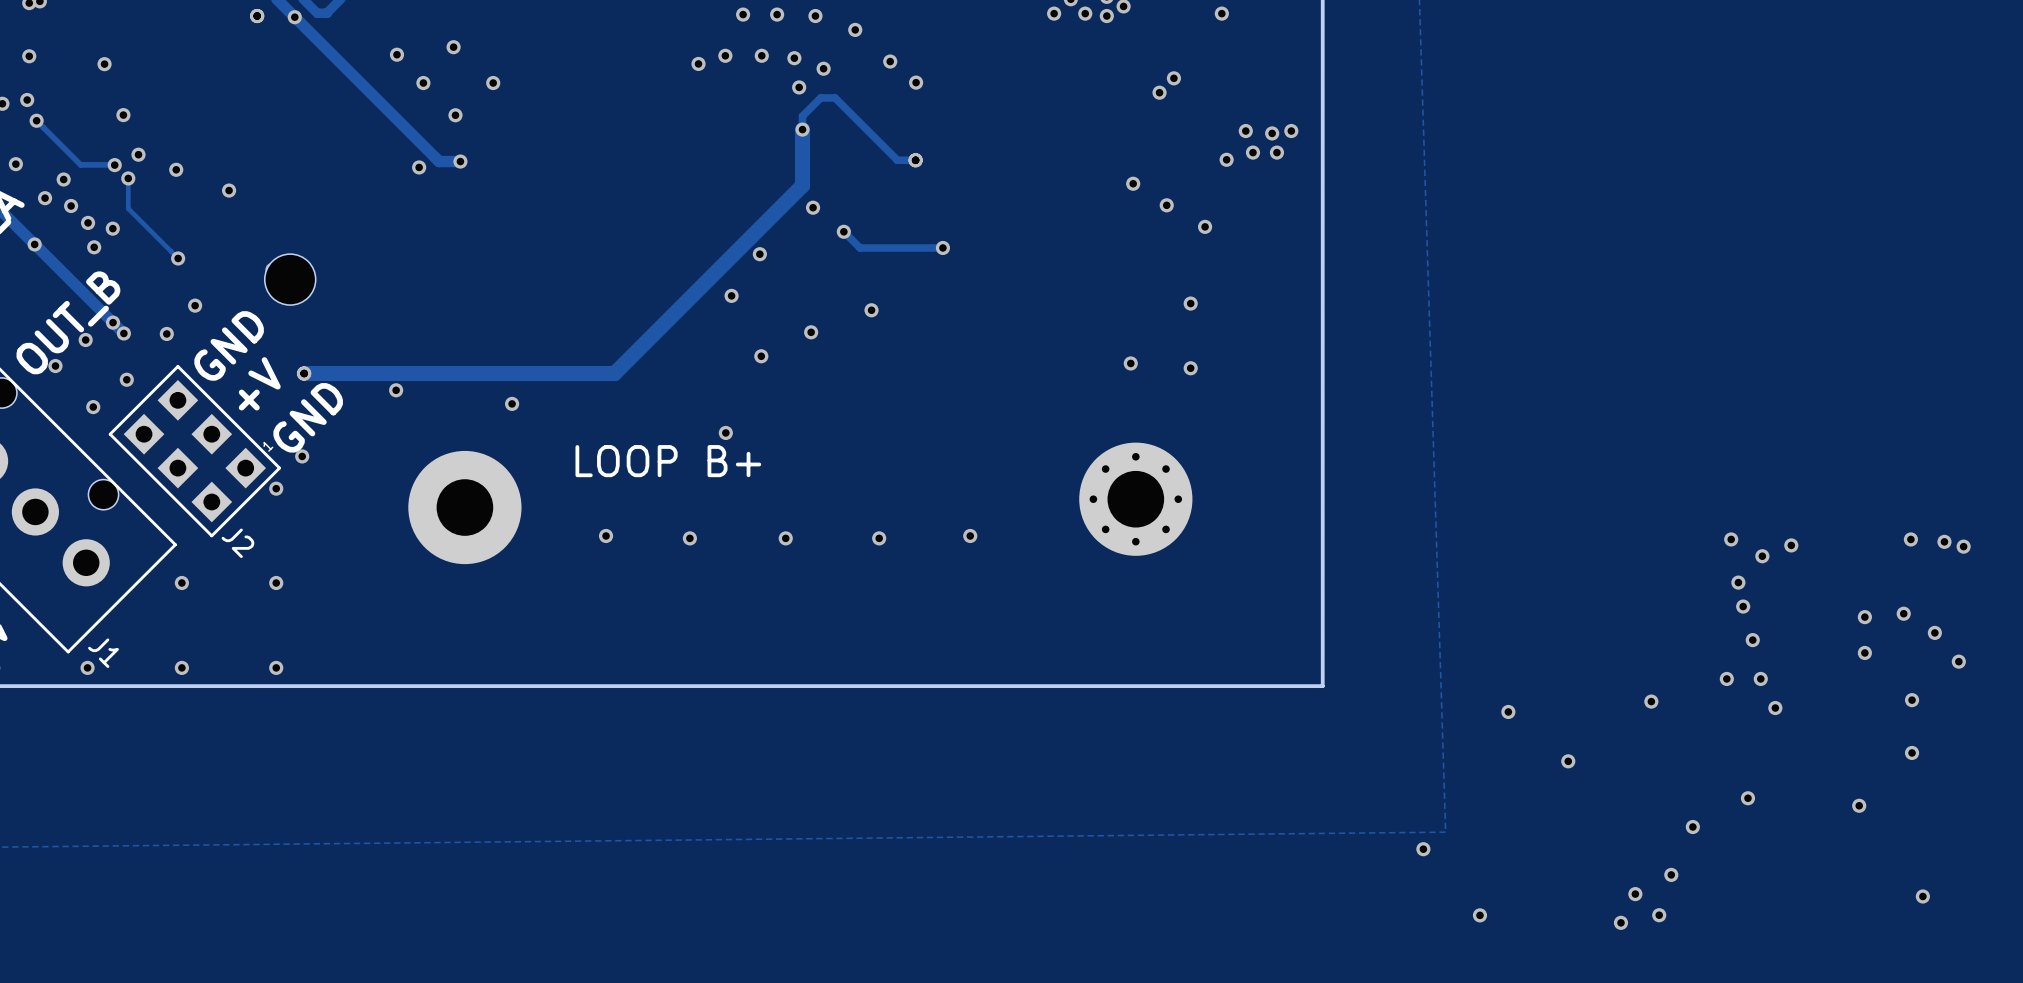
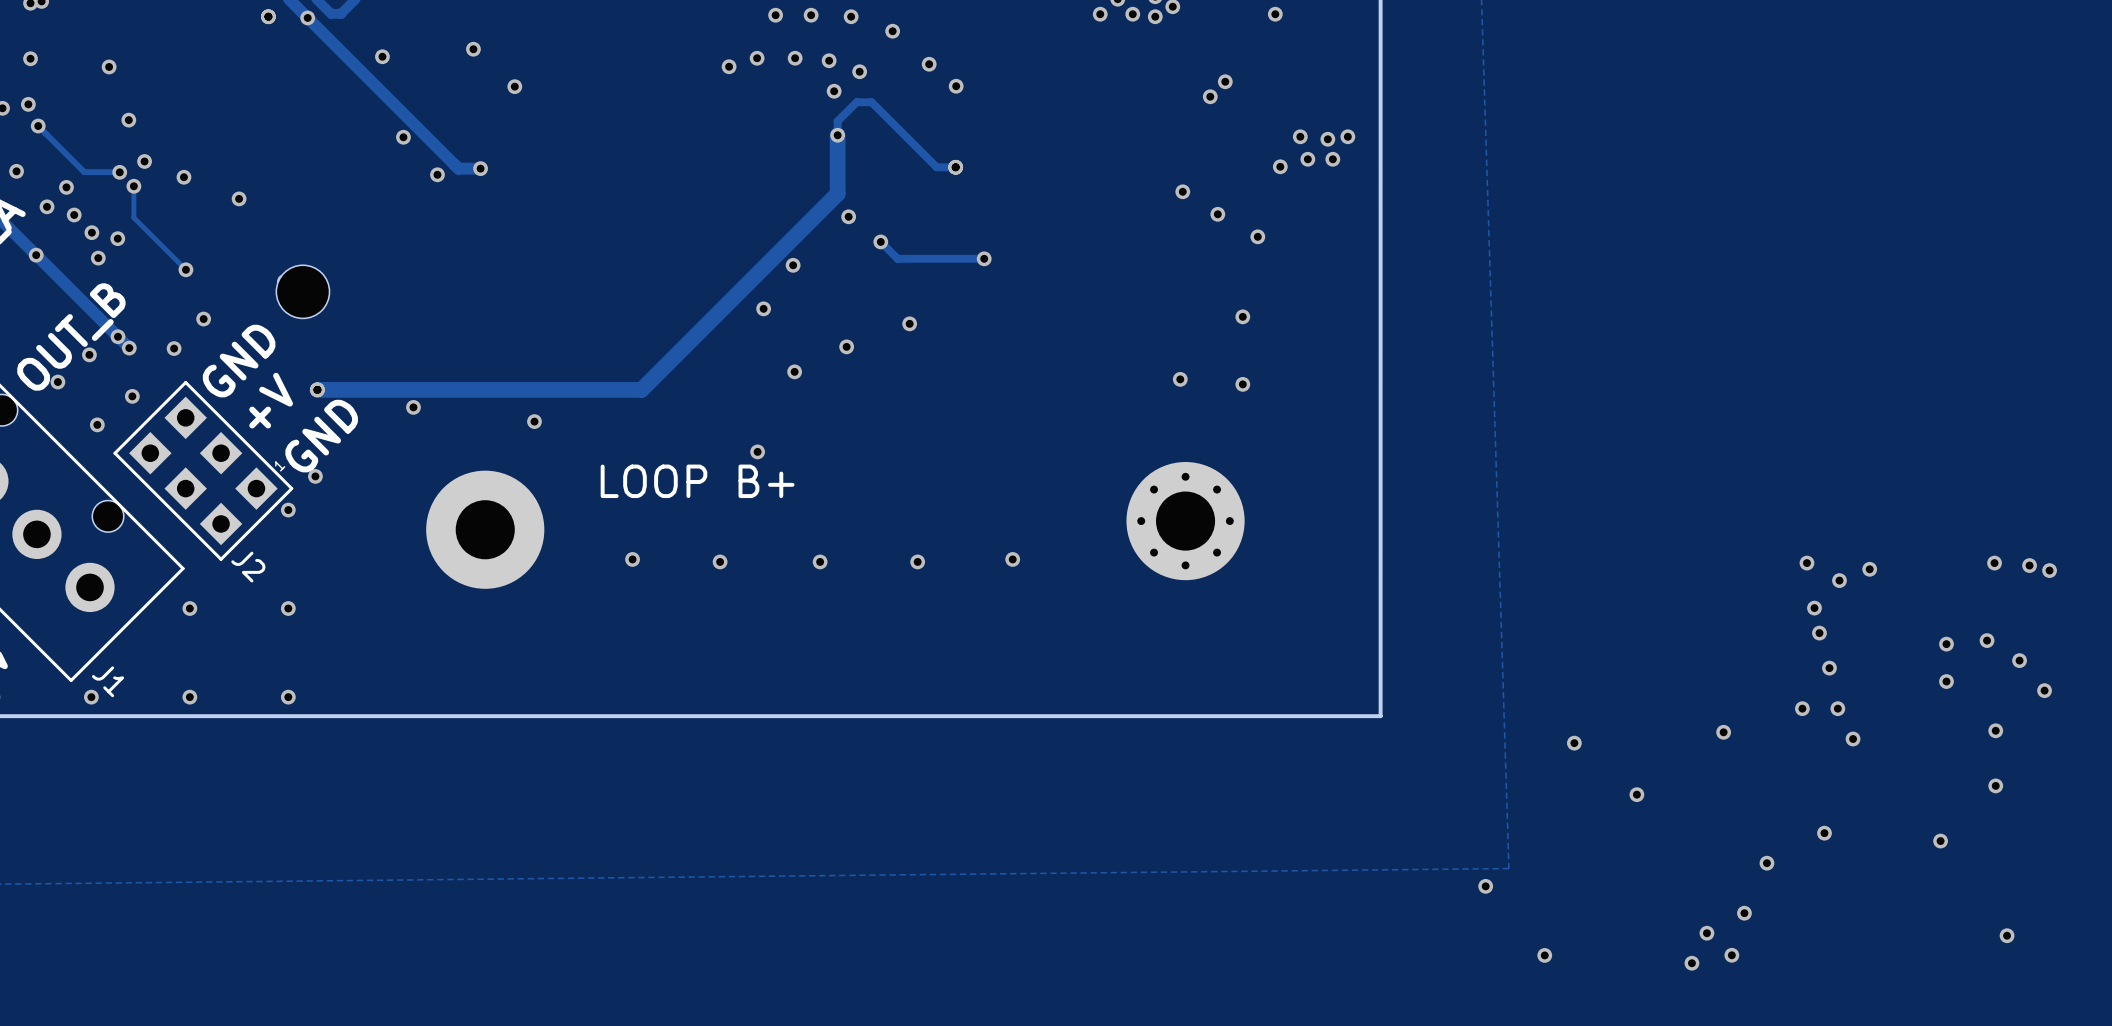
via position: (396, 54) -> (382, 56)
via: (423, 83) -> none
via: (455, 115) -> none
via: none -> (403, 137)

